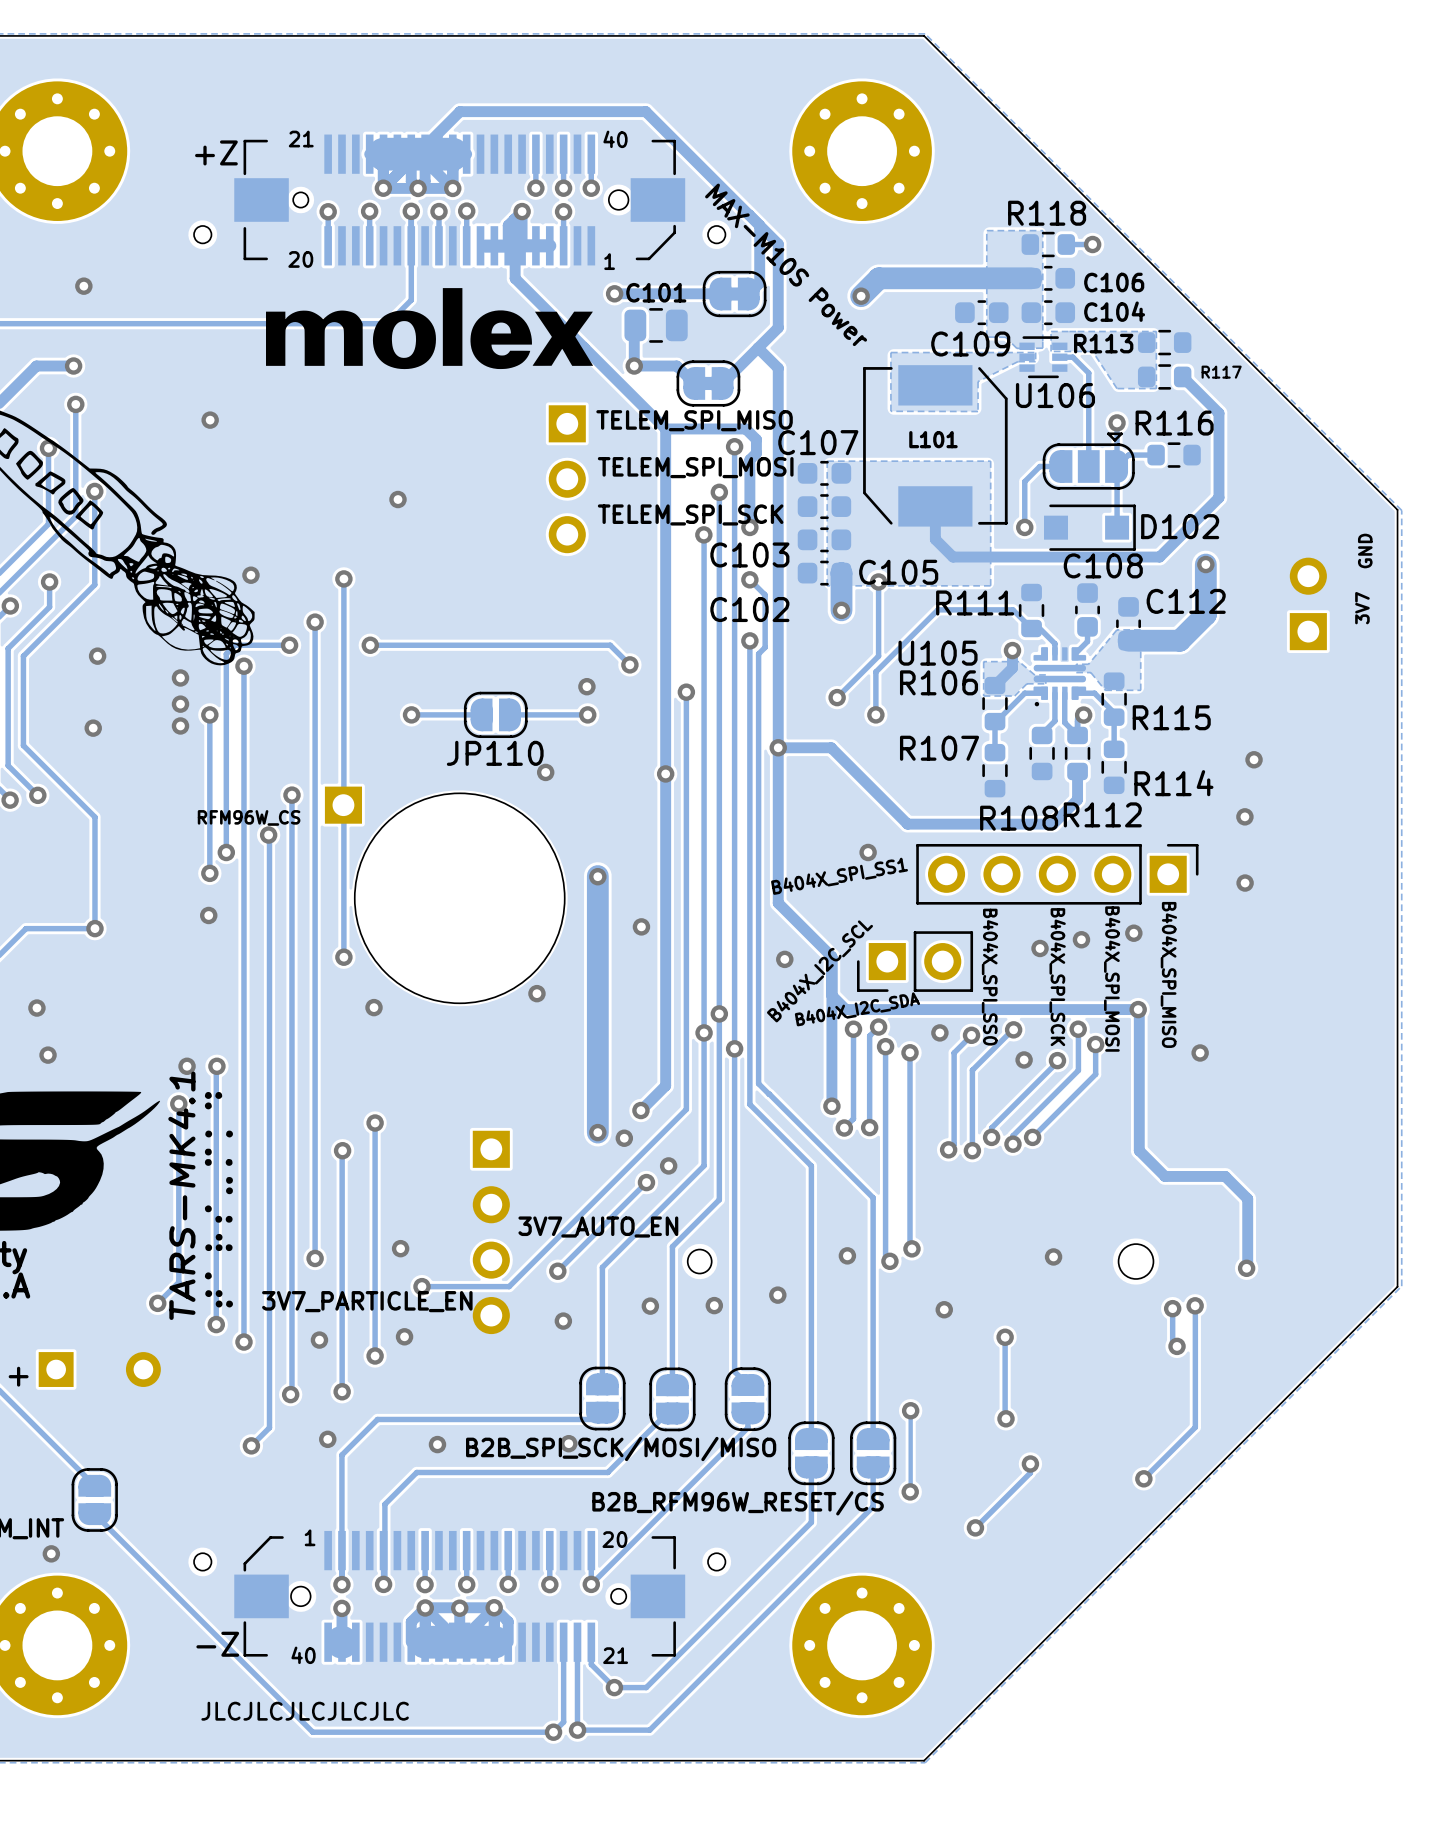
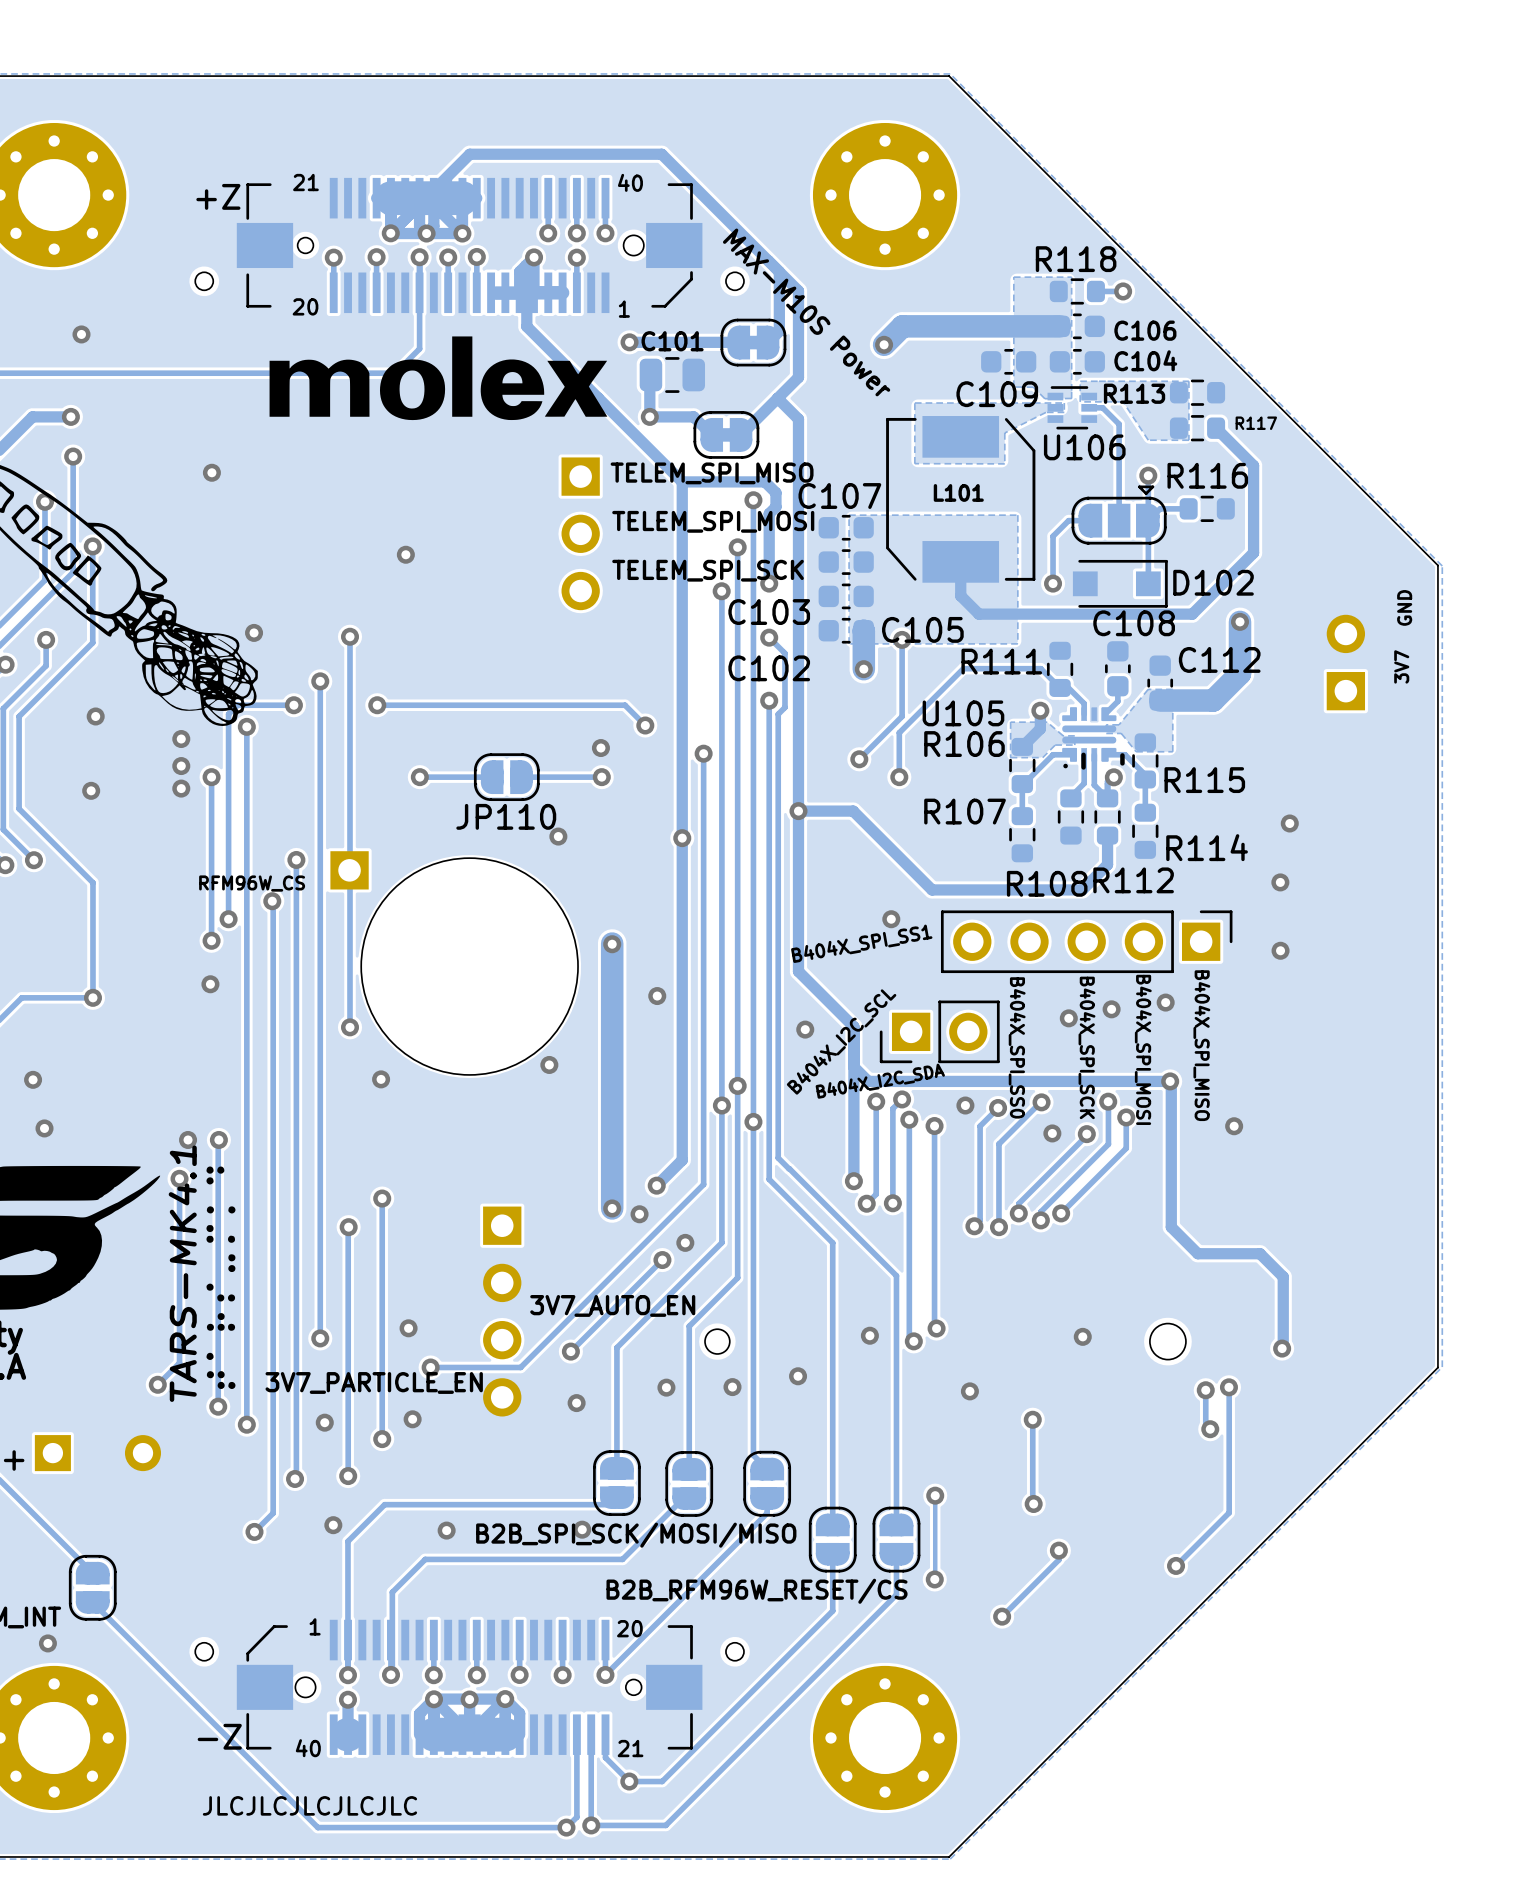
line: none -> (1083, 754) (1083, 767)
line: none -> (1122, 755) (1122, 763)

